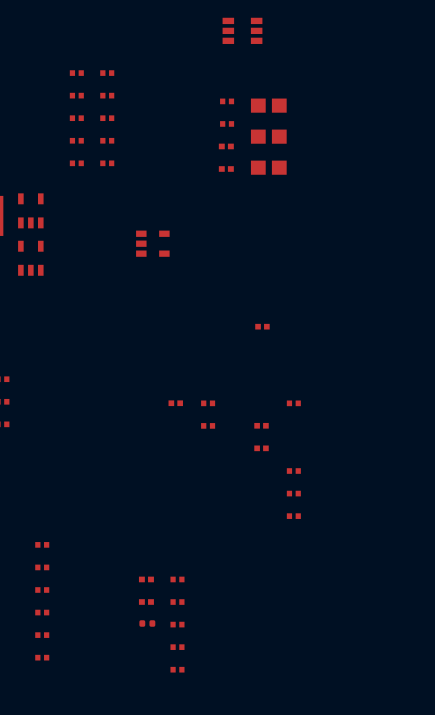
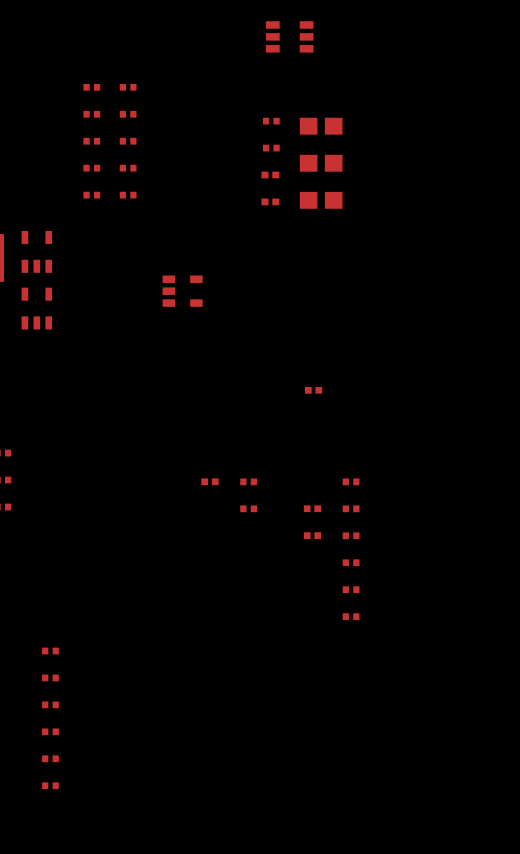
part: none -> (351, 508)
part: none -> (351, 535)
part: (146, 579) -> none
part: (177, 579) -> none
part: (146, 601) -> none
part: (177, 602) -> none
part: (147, 623) -> none
part: (177, 624) -> none
part: (177, 647) -> none
part: (177, 669) -> none

